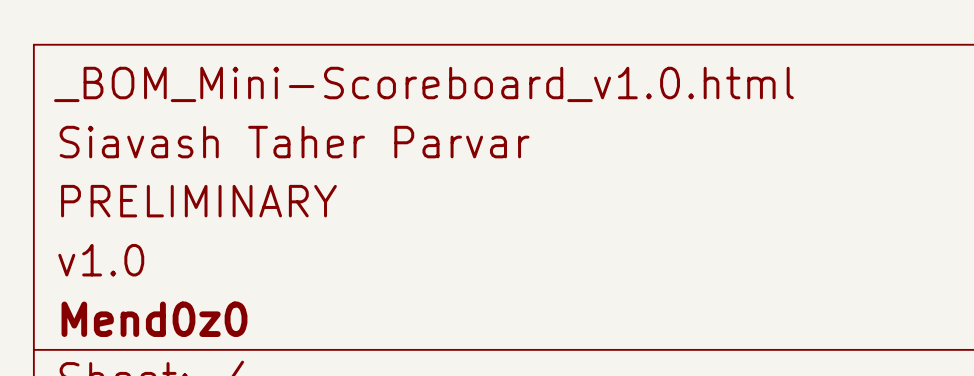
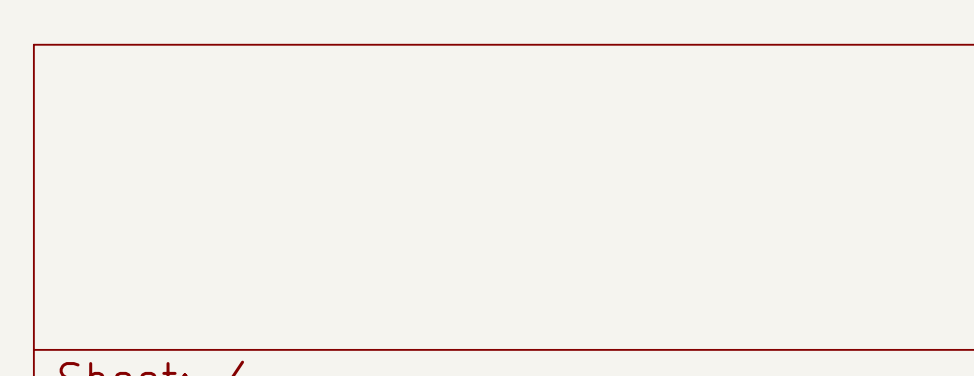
title block: _BOM_Mini-Scoreboard_v1.0.html (423, 84) -> none
title block: Siavash Taher Parvar (294, 142) -> none
title block: PRELIMINARY (198, 201) -> none
title block: v1.0 (101, 260) -> none
title block: Mend0z0 (154, 319) -> none

